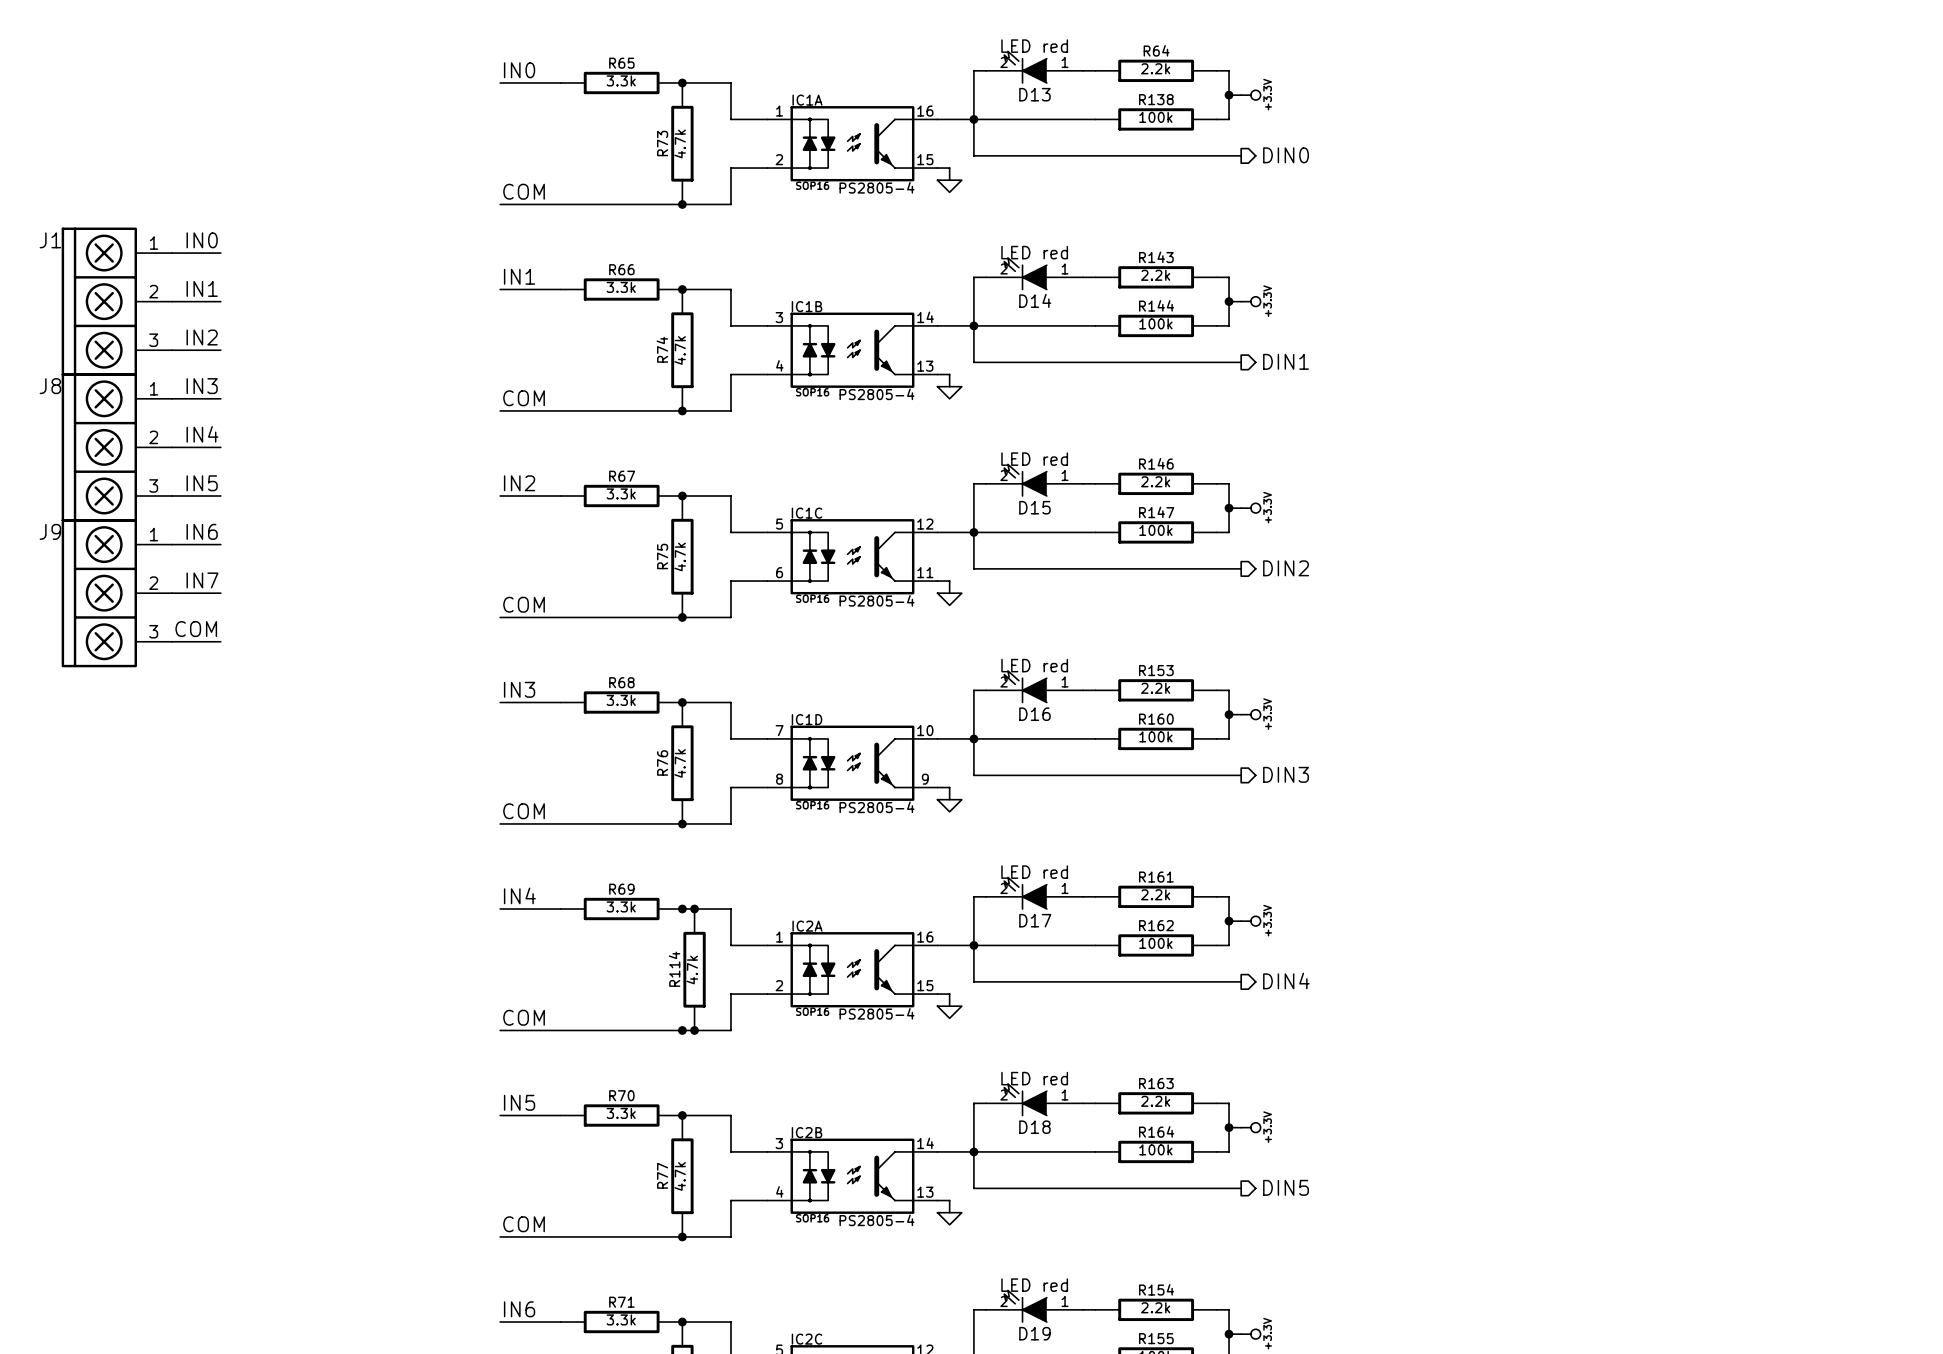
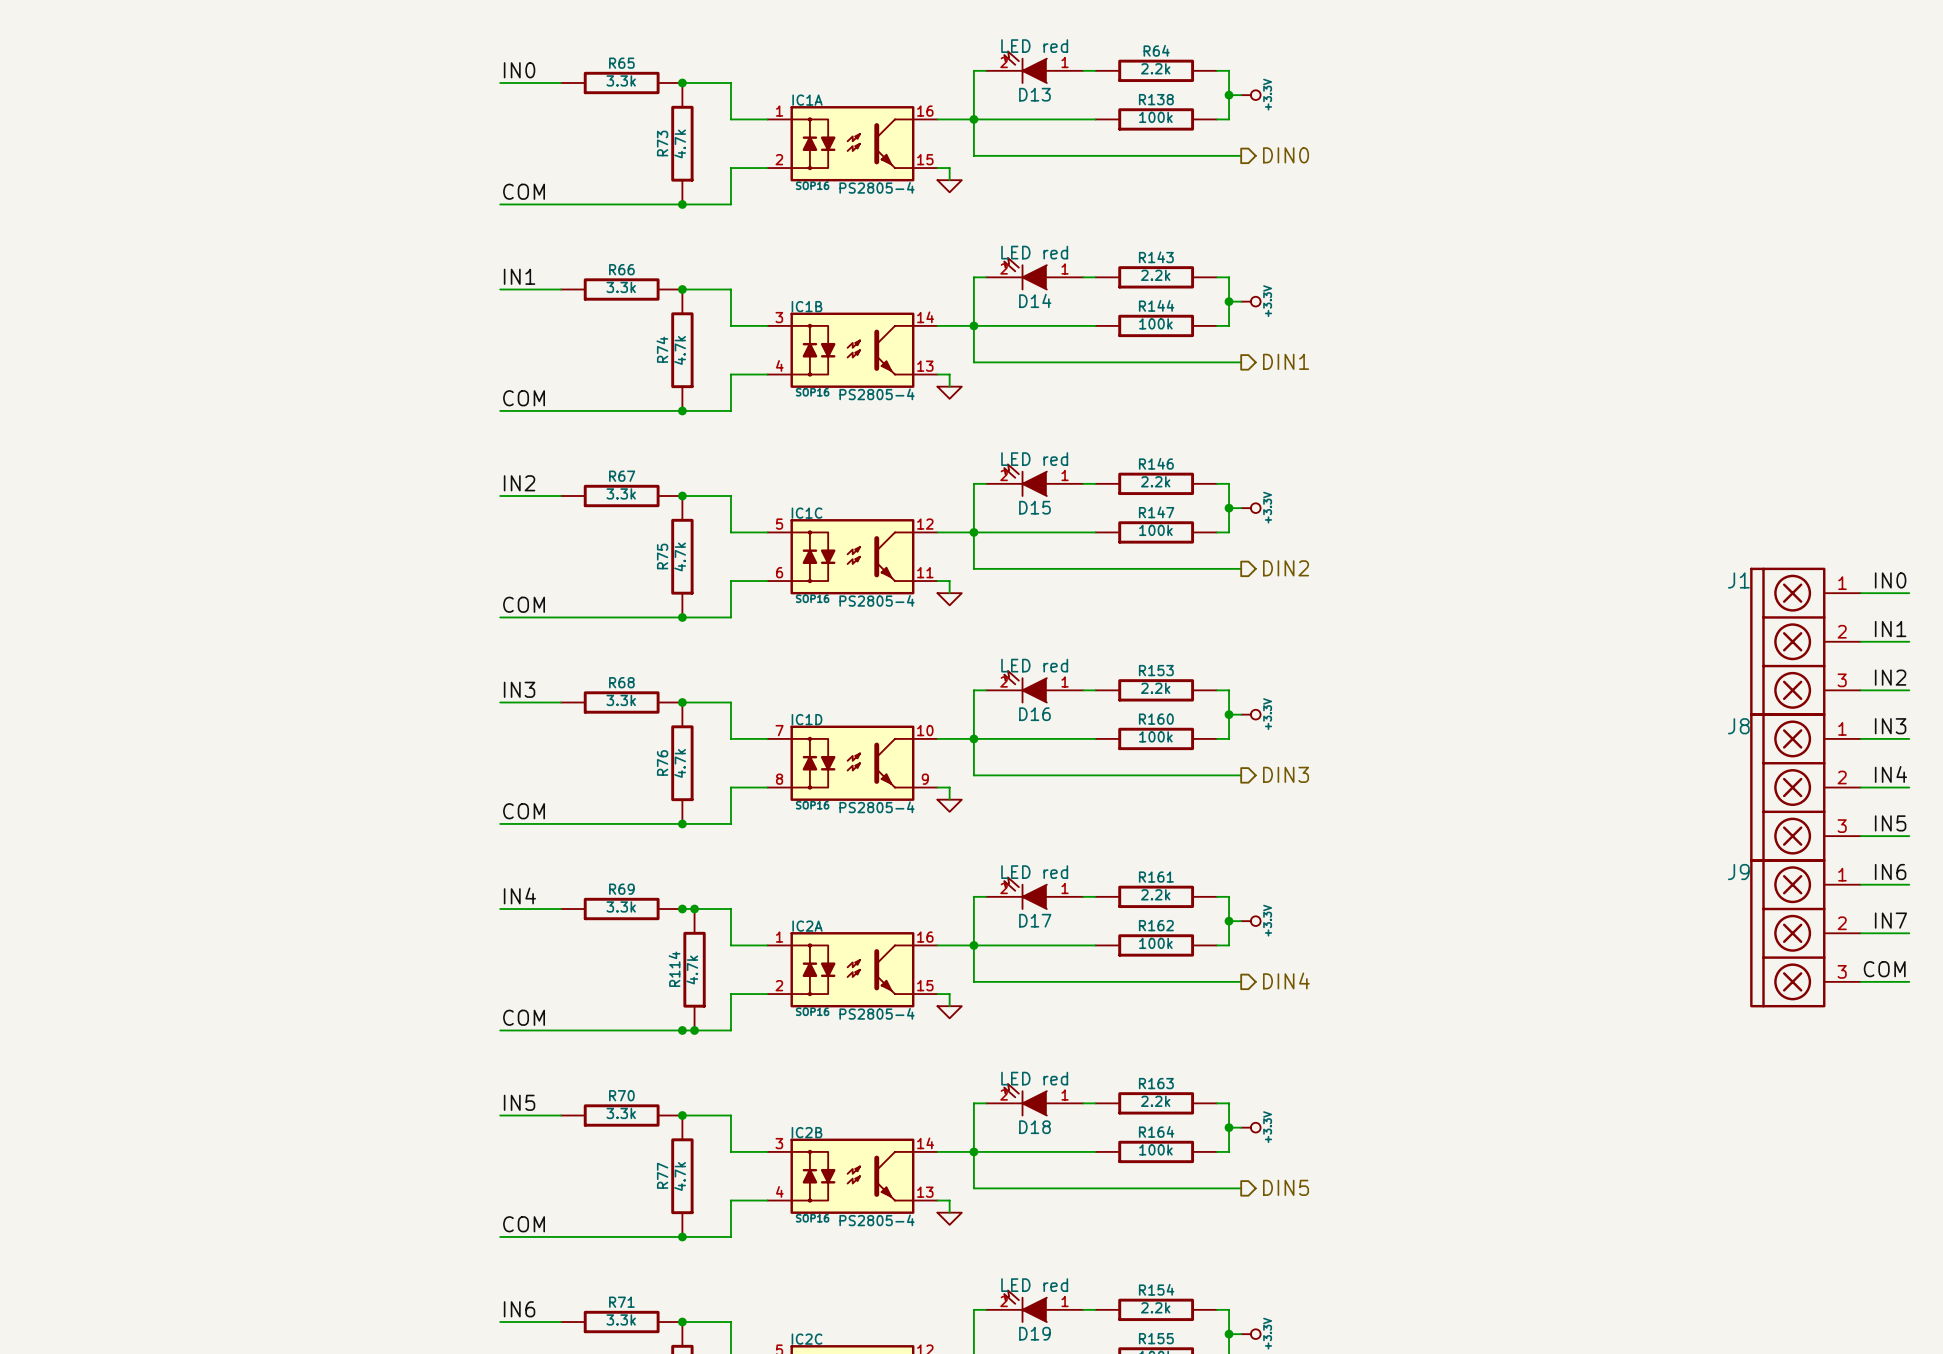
label: IN0 (202, 240) -> none
wire: (172, 253) (220, 253) -> none
label: IN1 (202, 288) -> none
J1 position: (116, 301) -> (1805, 641)
wire: (172, 301) (220, 301) -> none
label: IN2 (202, 337) -> none
wire: (172, 350) (220, 350) -> none
label: IN3 (202, 386) -> none
wire: (172, 398) (220, 398) -> none
label: IN4 (202, 434) -> none
J8 position: (116, 447) -> (1805, 787)
wire: (172, 447) (220, 447) -> none
label: IN5 (202, 483) -> none
wire: (172, 496) (220, 496) -> none
label: IN6 (202, 531) -> none
wire: (172, 544) (220, 544) -> none
label: IN7 (202, 580) -> none
label: none -> IN0 (1890, 580)
J9 position: (116, 593) -> (1805, 933)
wire: (172, 593) (220, 593) -> none
wire: none -> (1860, 593) (1909, 593)
label: COM (196, 629) -> none
label: none -> IN1 (1890, 629)
wire: (172, 641) (220, 641) -> none
wire: none -> (1860, 641) (1909, 641)
label: none -> IN2 (1890, 677)
wire: none -> (1860, 690) (1909, 690)
label: none -> IN3 (1890, 726)
wire: none -> (1860, 738) (1909, 738)
label: none -> IN4 (1890, 774)
wire: none -> (1860, 787) (1909, 787)
label: none -> IN5 (1890, 823)
wire: none -> (1860, 836) (1909, 836)
label: none -> IN6 (1890, 871)
wire: none -> (1860, 884) (1909, 884)
label: none -> IN7 (1890, 920)
wire: none -> (1860, 933) (1909, 933)
label: none -> COM (1884, 969)
wire: none -> (1860, 981) (1909, 981)

